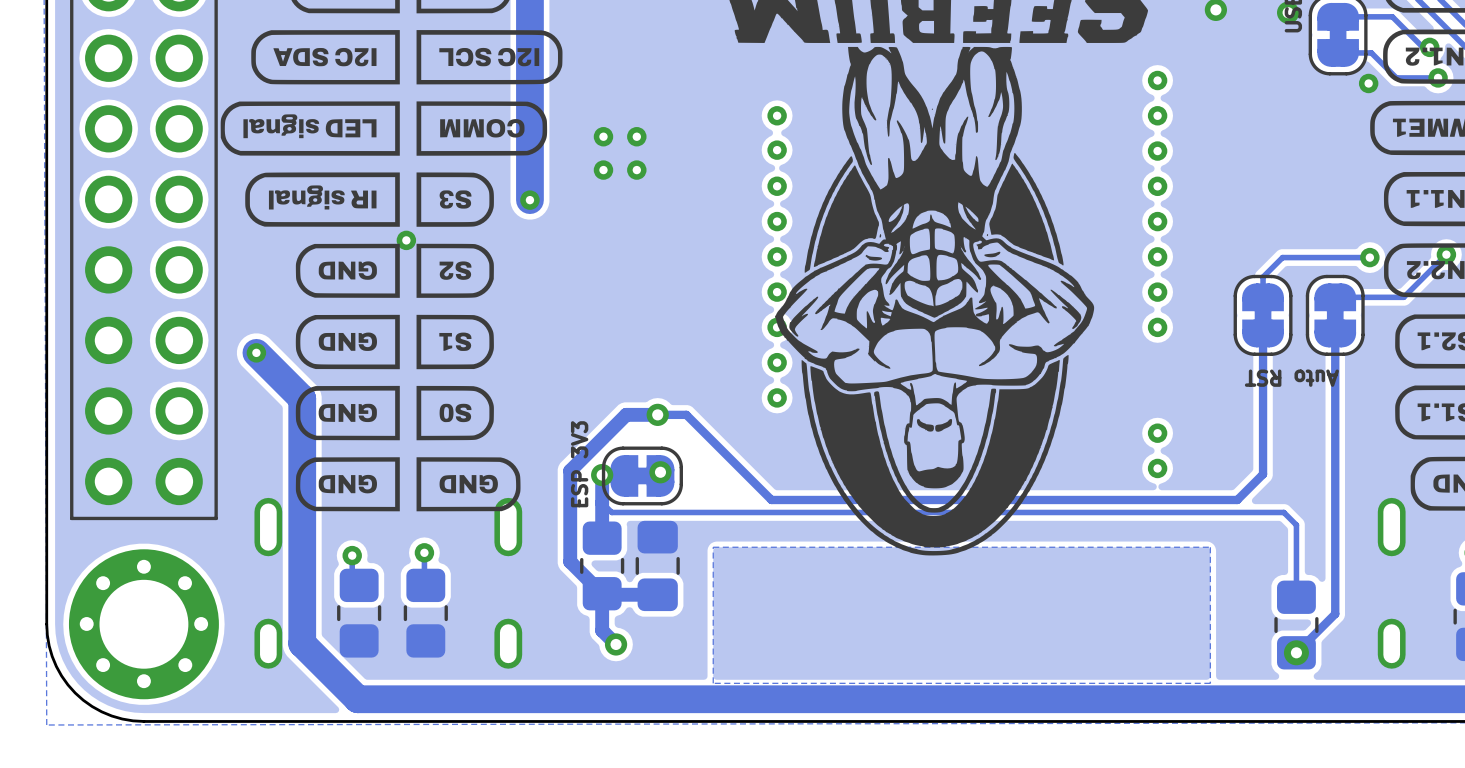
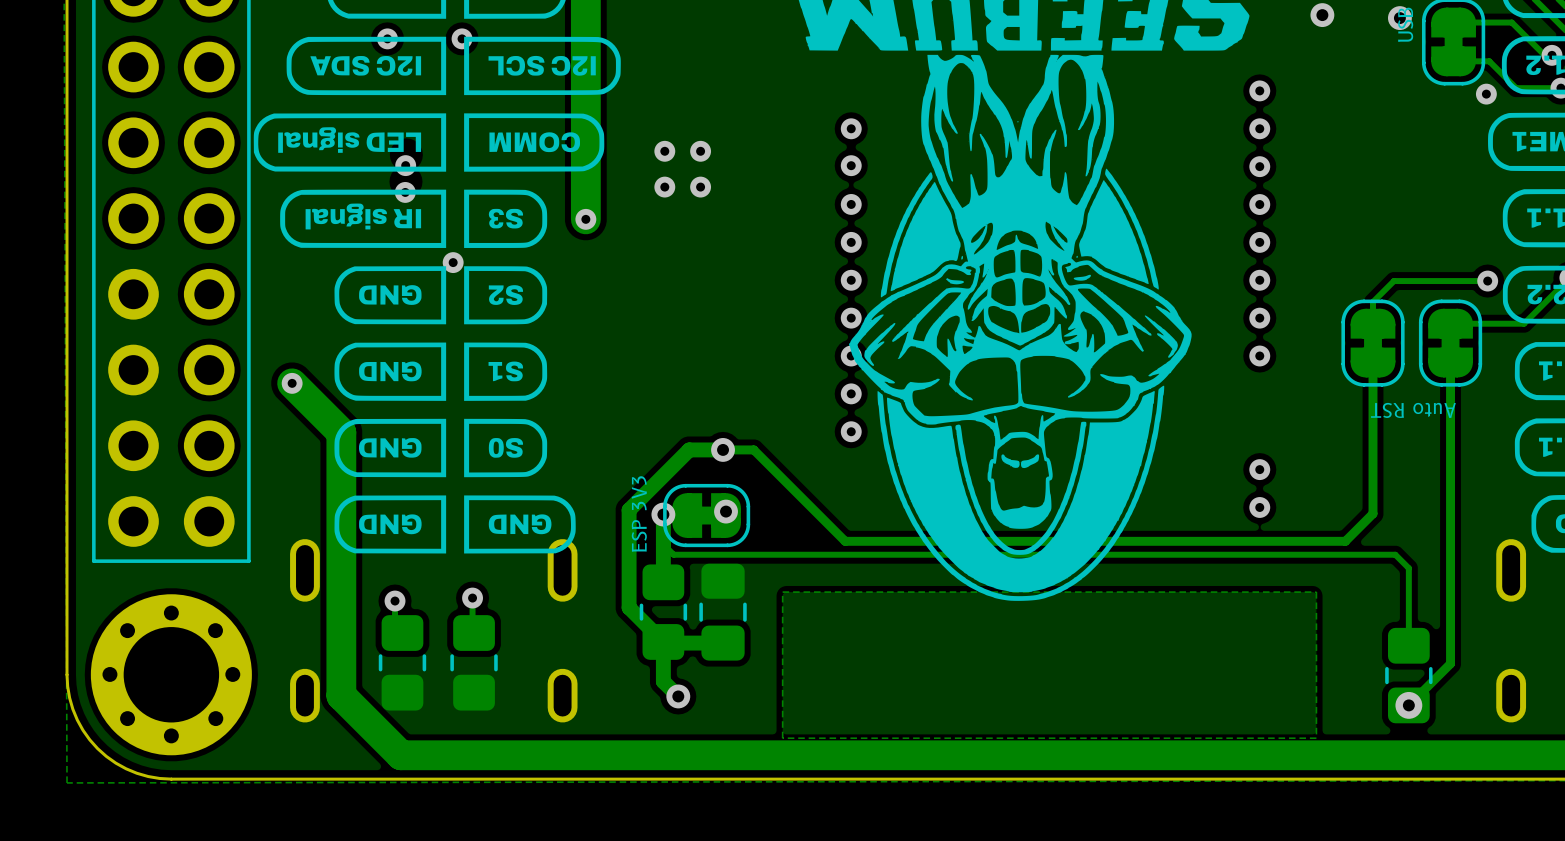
via: none -> (387, 38)
via: none -> (462, 38)
via: none -> (405, 165)
via: none -> (405, 192)

